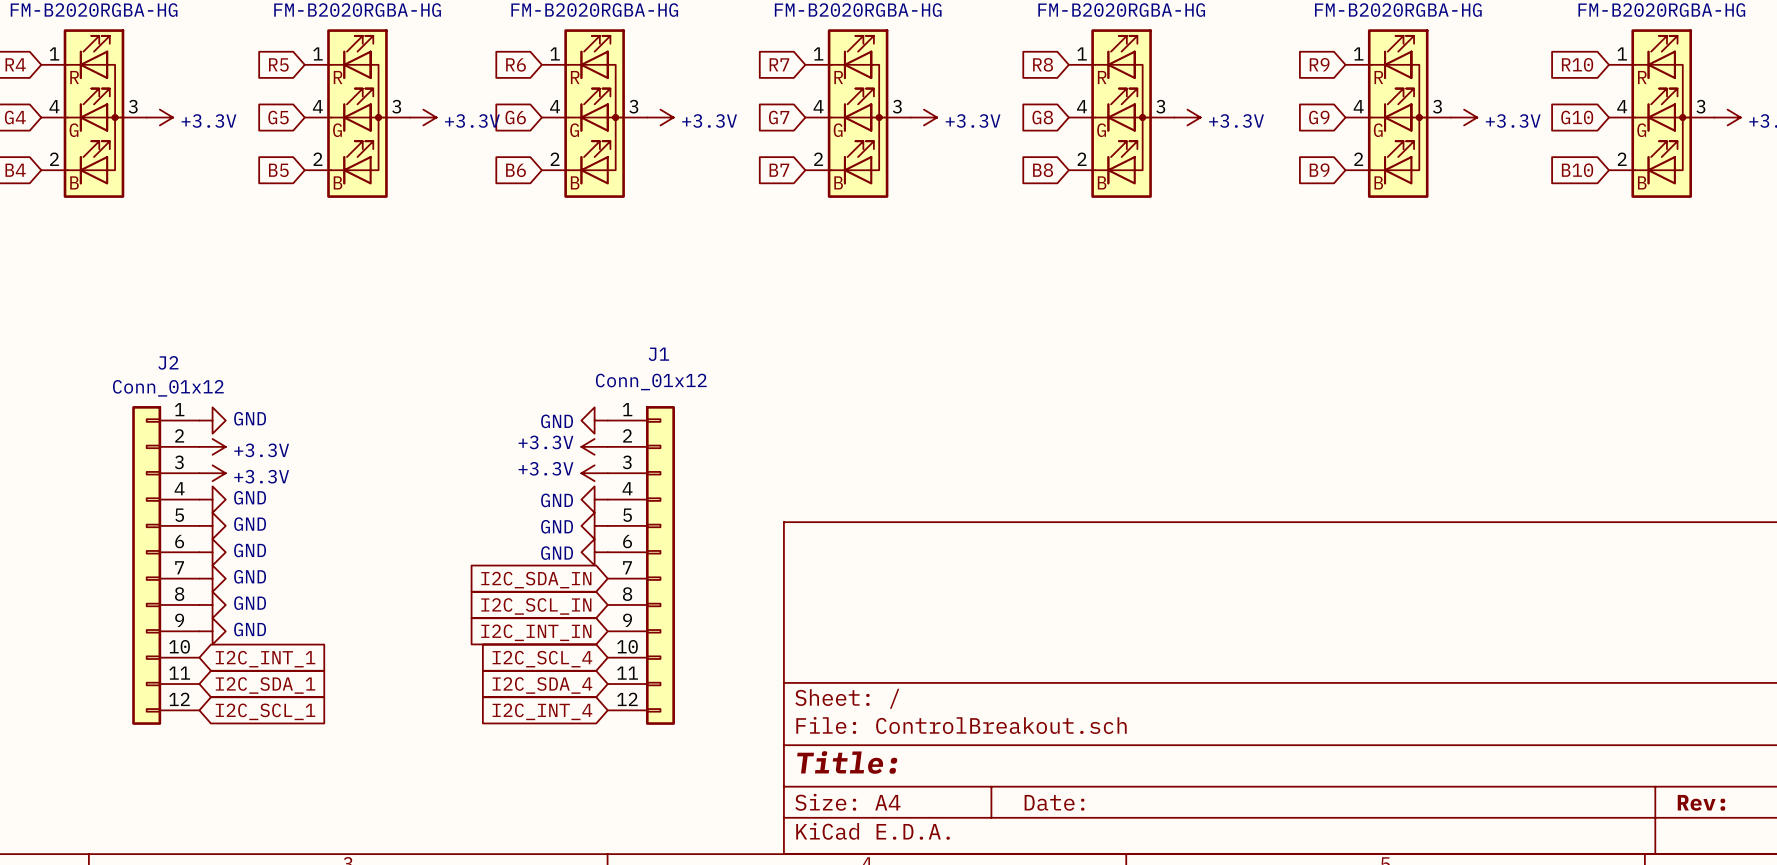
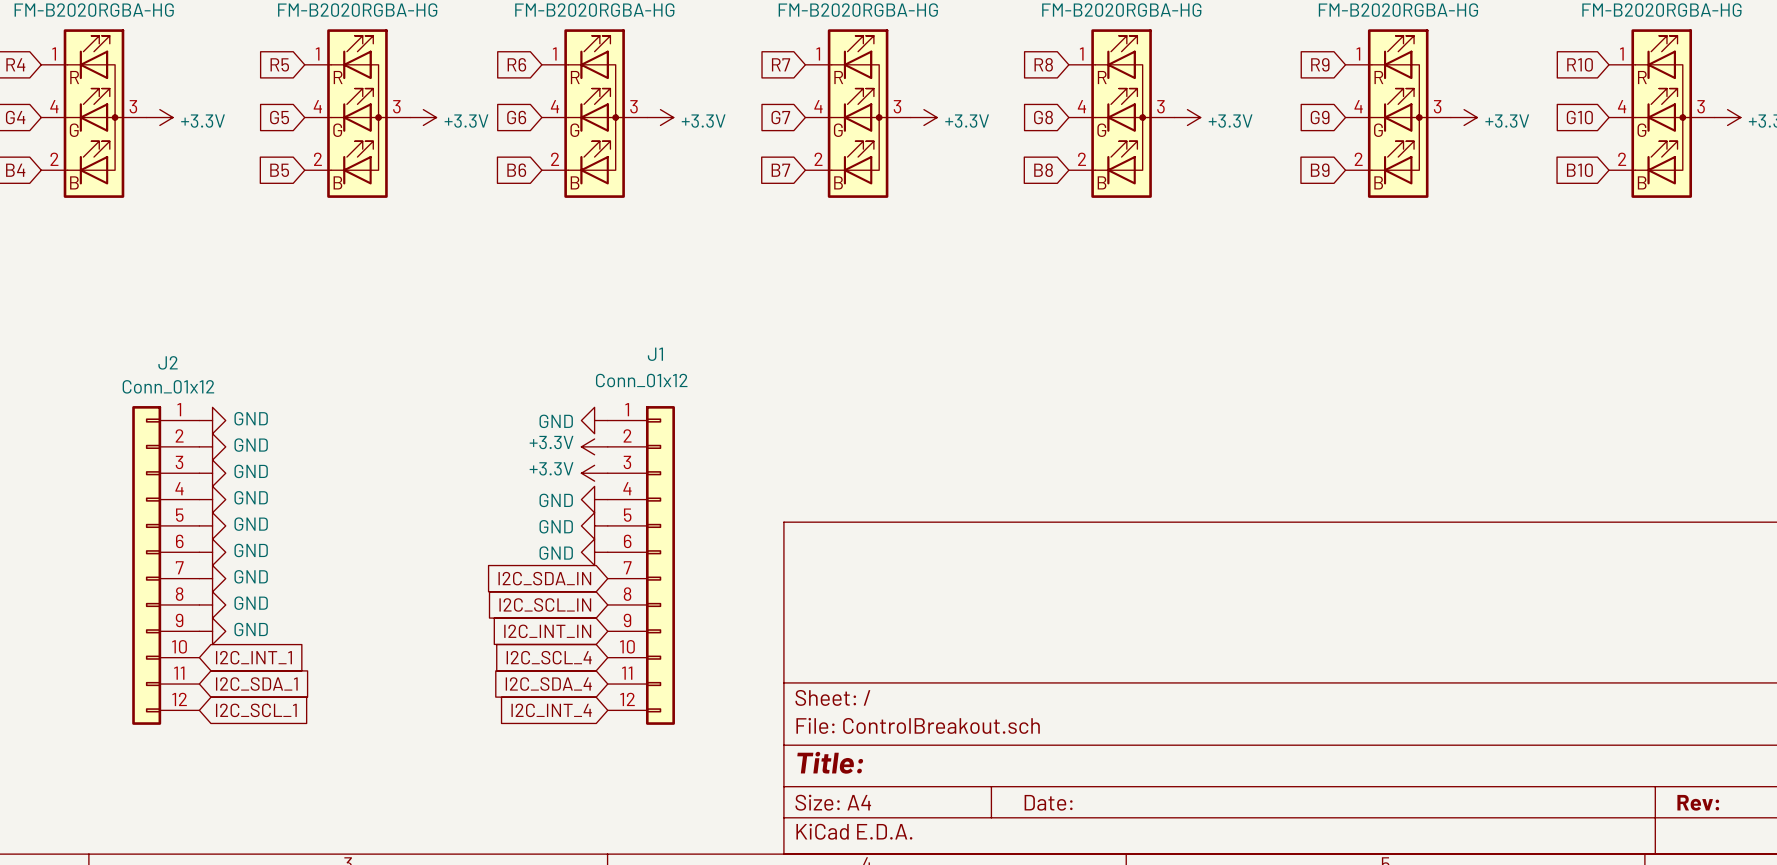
power symbol: +3.3V (212, 446) -> GND (212, 446)
power symbol: +3.3V (212, 473) -> GND (212, 473)

